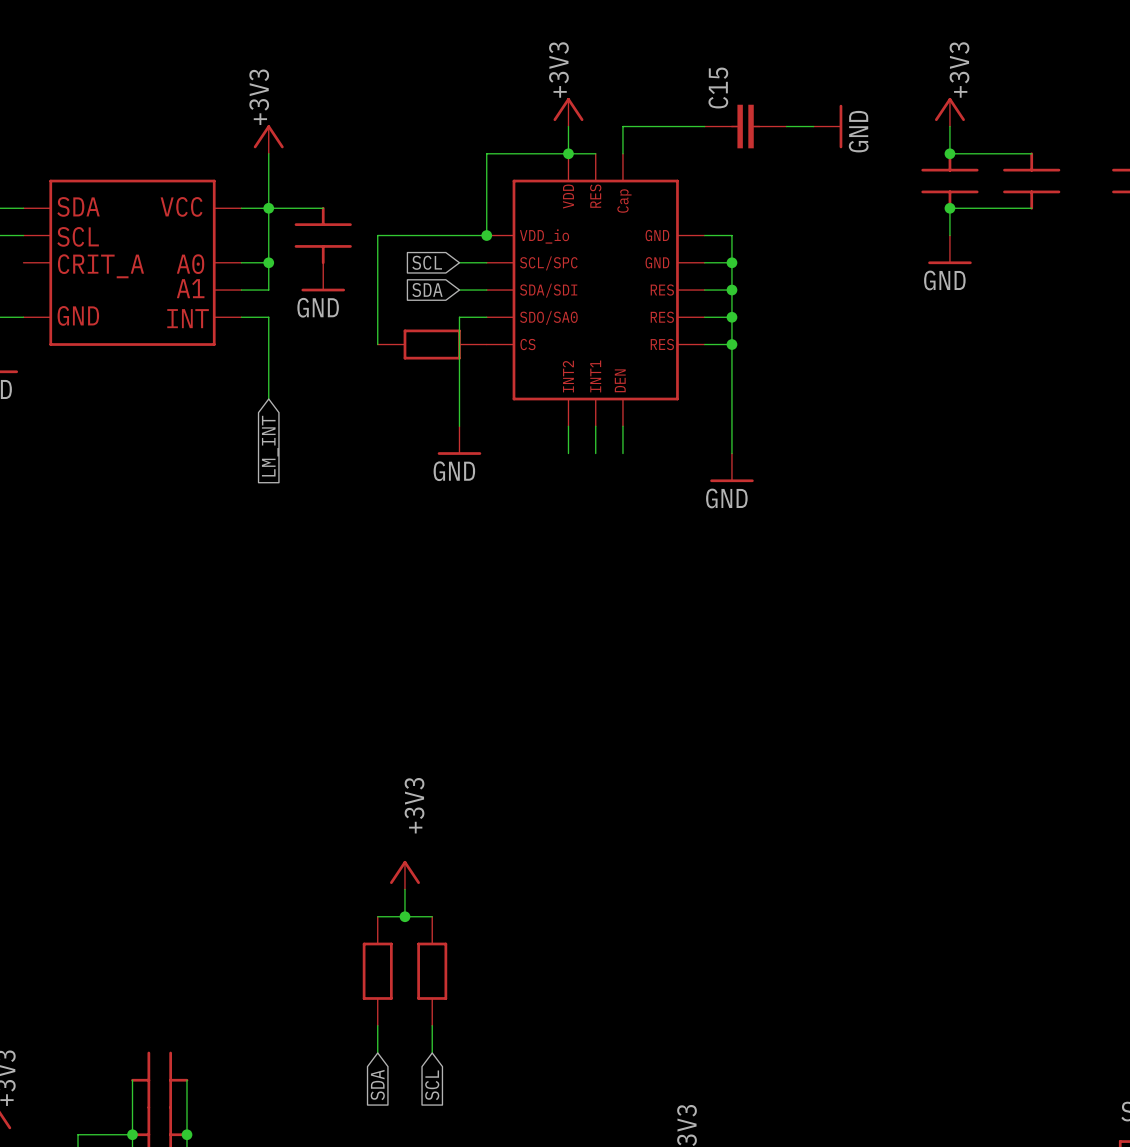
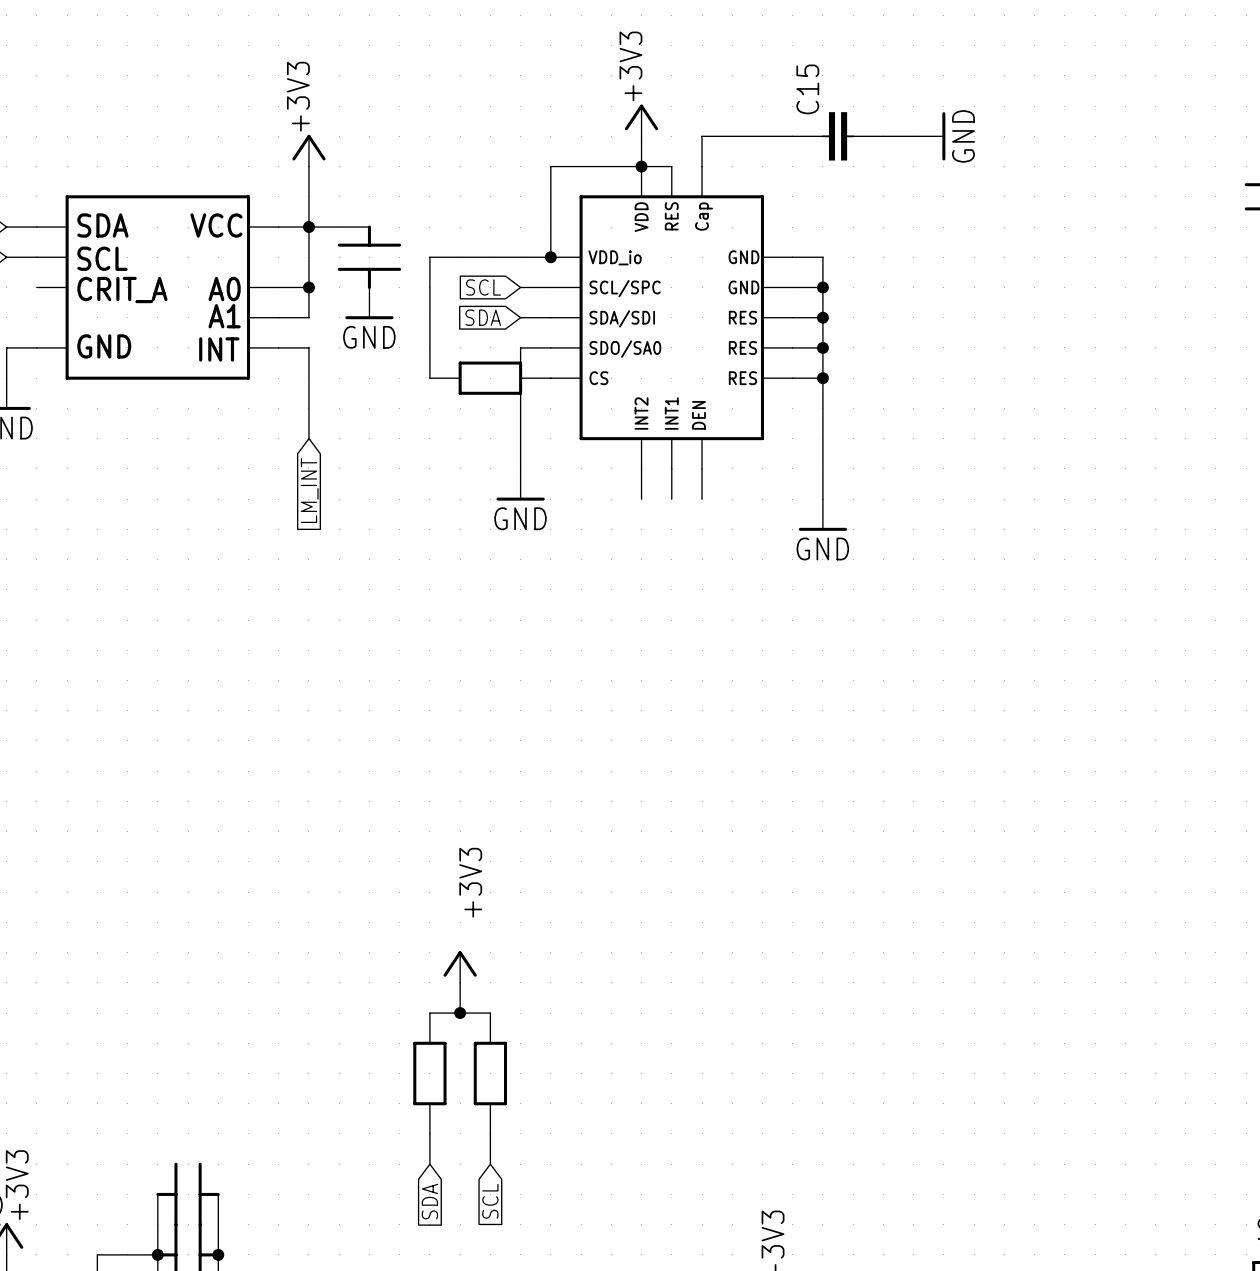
power symbol: +3V3 (949, 112) -> none
wire: (949, 126) (949, 153) (1031, 153) -> none
junction: (949, 153) -> none
part: (949, 181) -> none
part: (1031, 181) -> none
junction: (949, 208) -> none
wire: (1031, 208) (949, 208) (949, 235) -> none
power symbol: GND (949, 249) -> none

